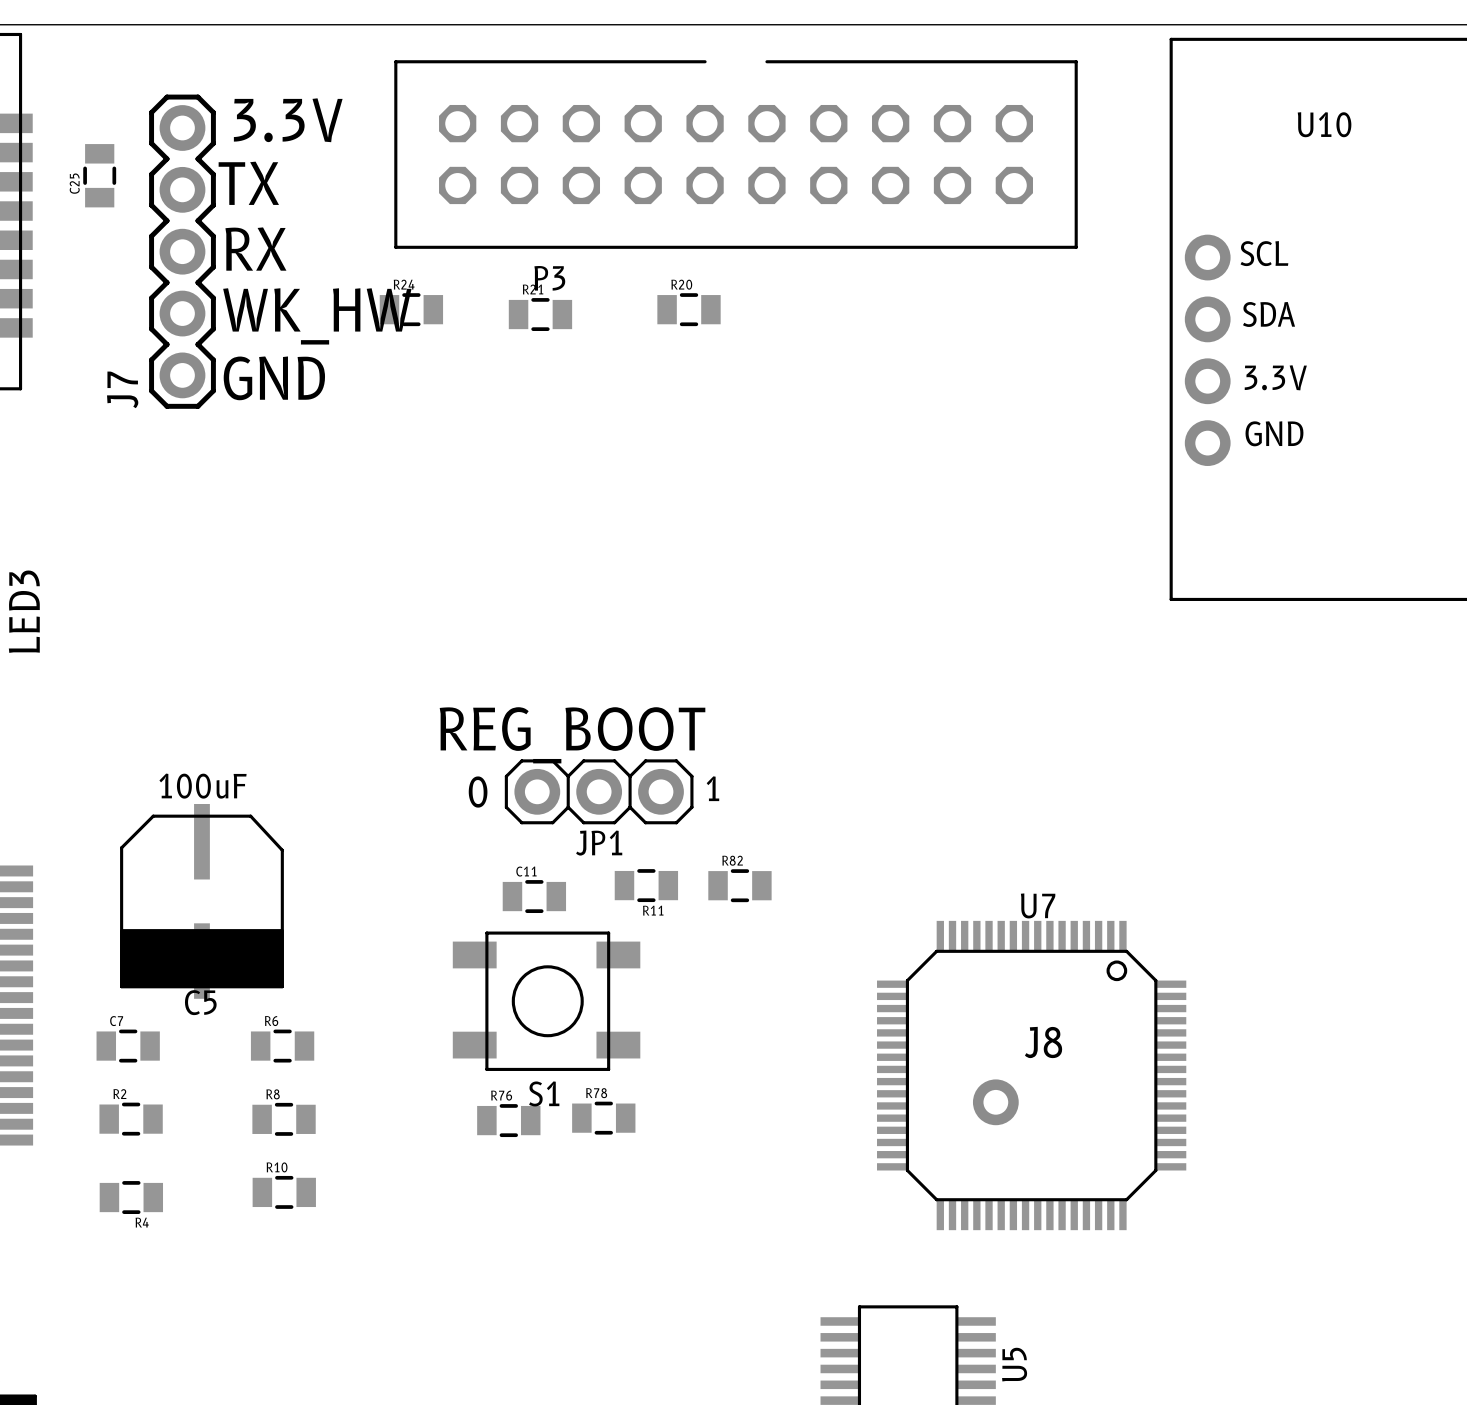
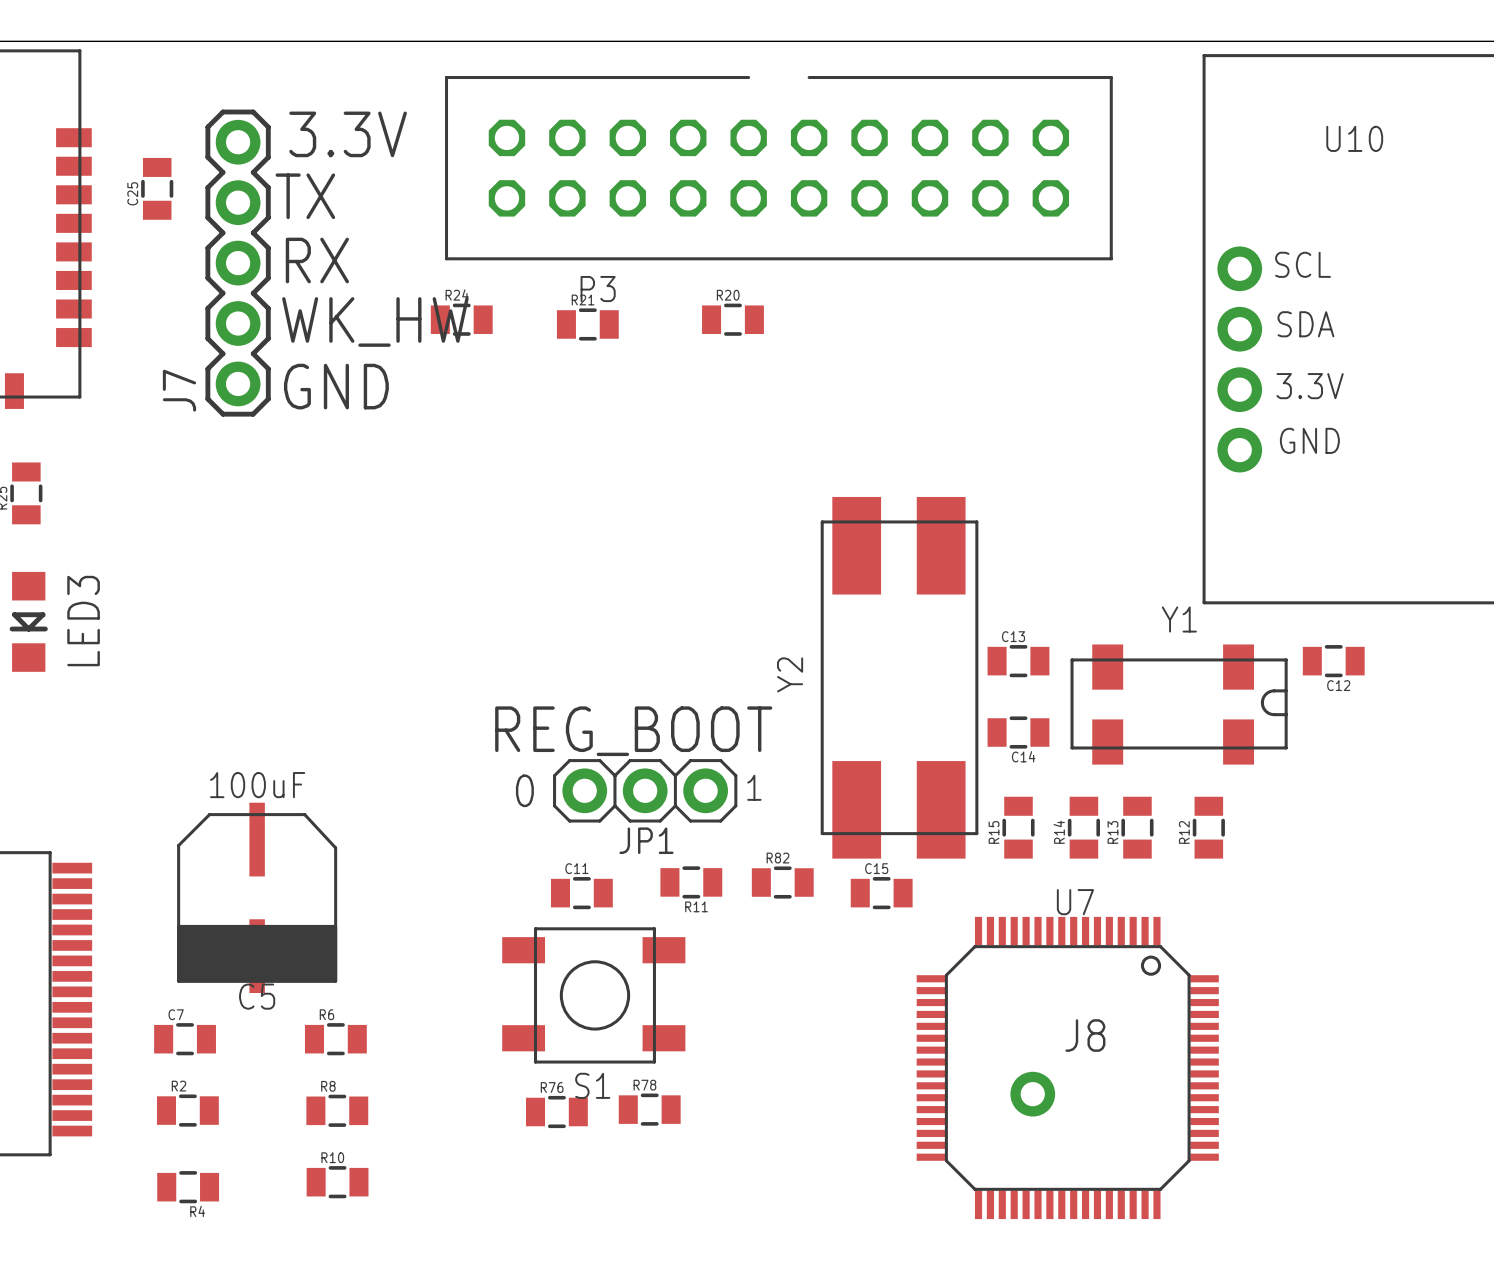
C13: none -> (1018, 661)
C12: none -> (1333, 661)
Y2: none -> (899, 677)
Y1: none -> (1179, 704)
C14: none -> (1018, 732)
R15: none -> (1018, 827)
R14: none -> (1083, 827)
R13: none -> (1137, 827)
R12: none -> (1208, 827)
C15: none -> (881, 893)

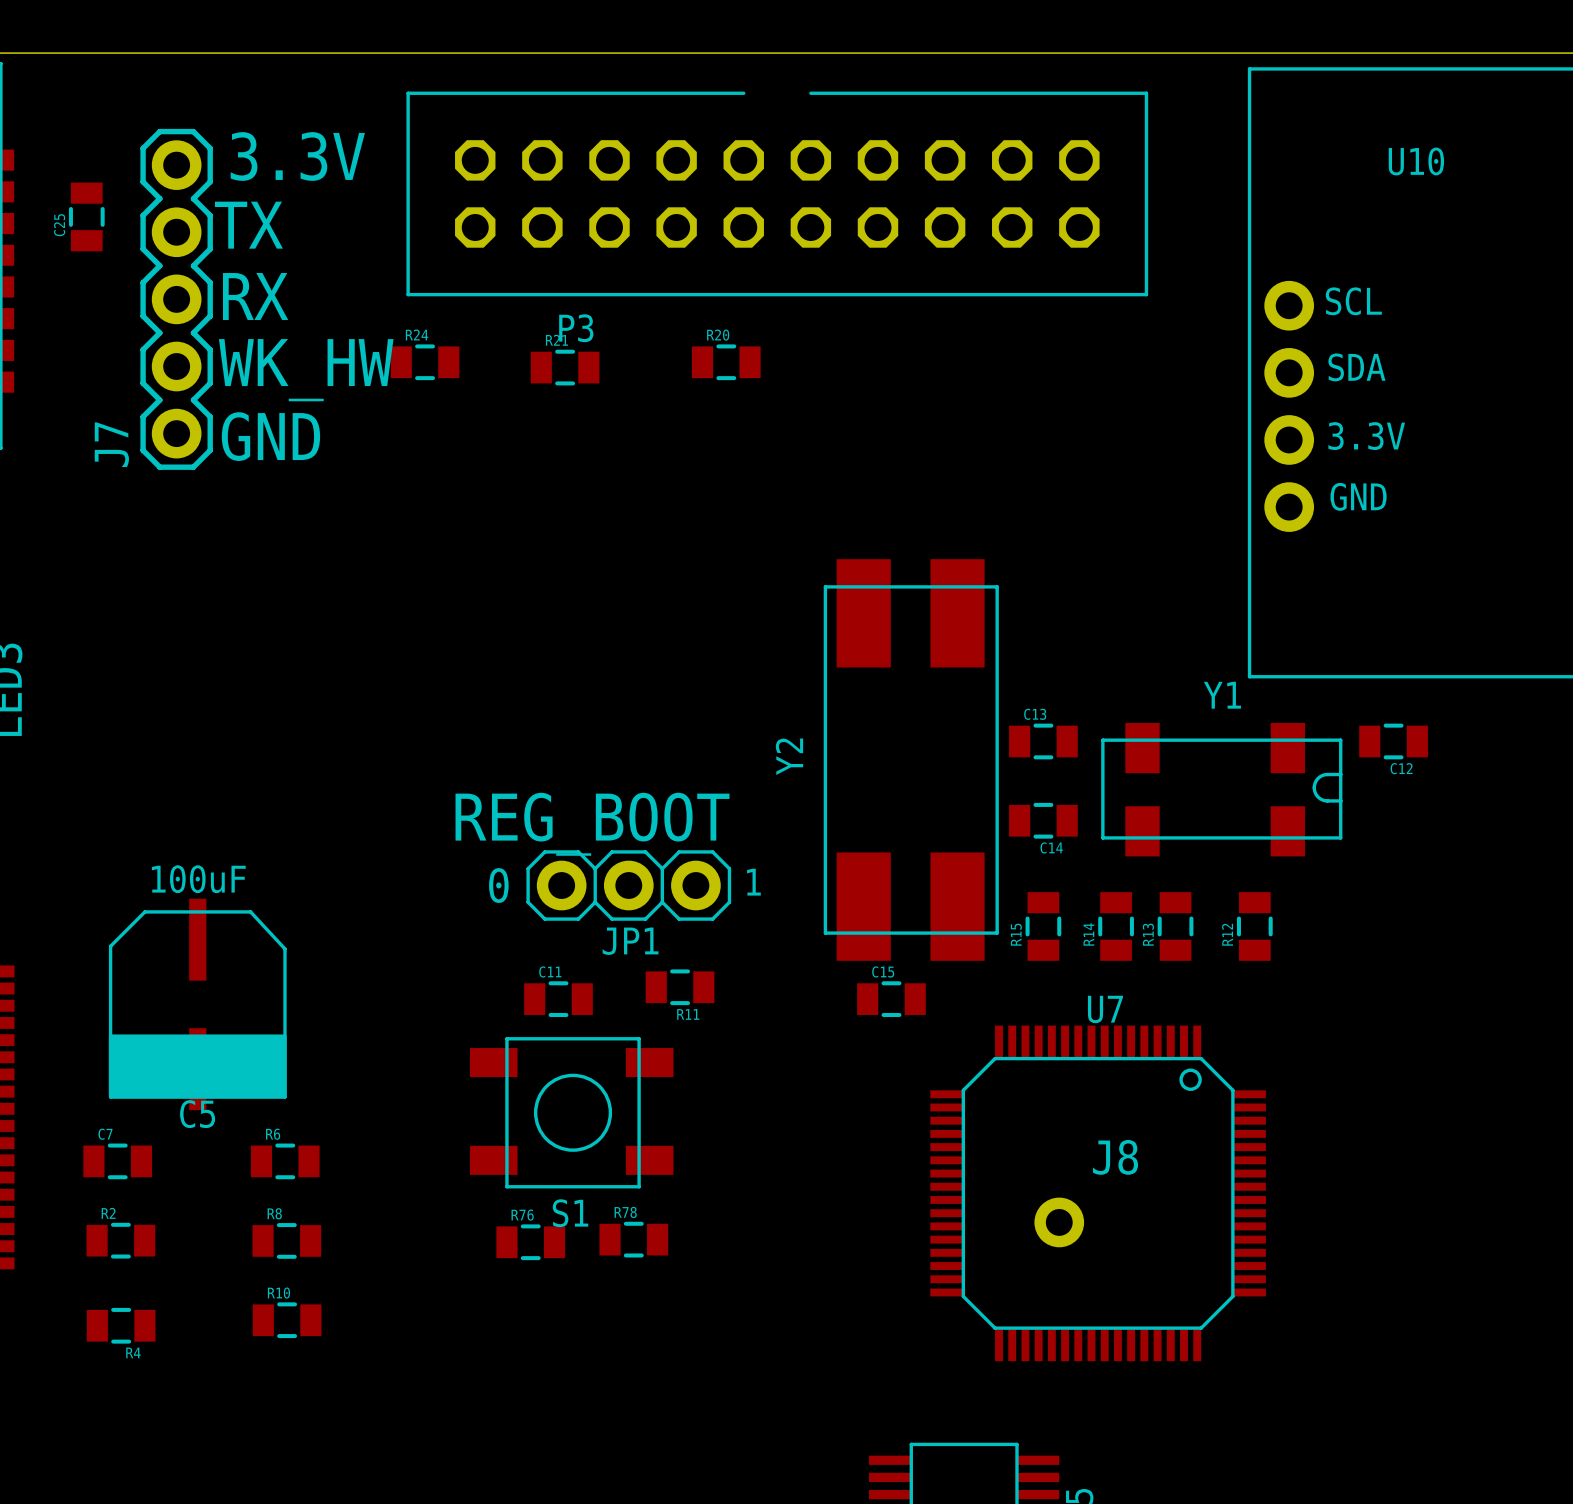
R82: (782, 882) -> none

